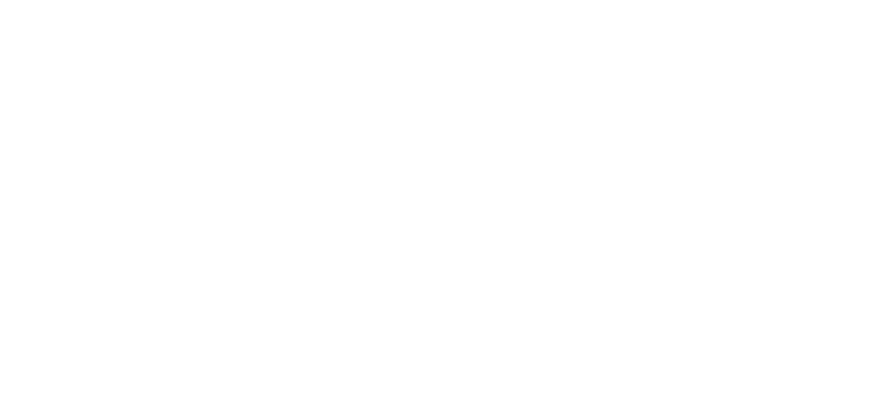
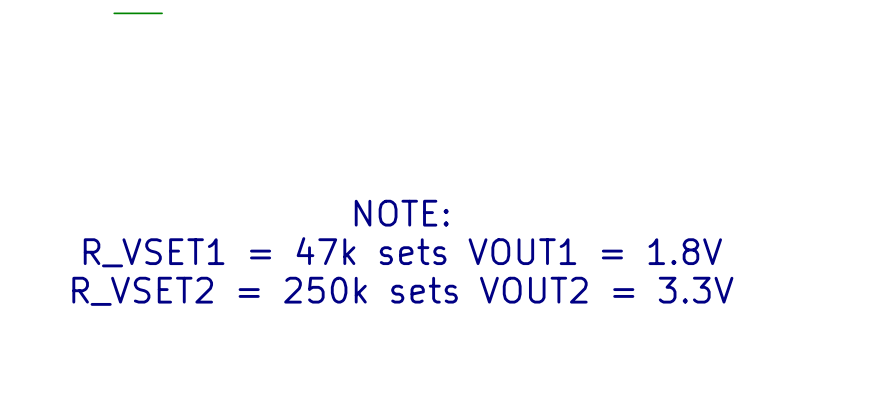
wire: none -> (114, 13) (162, 13)
text: none -> NOTE: (401, 213)
text: none -> R_VSET1 = 47k sets VOUT1 = 1.8V (402, 252)
text: none -> R_VSET2 = 250k sets VOUT2 = 3.3V (402, 291)

